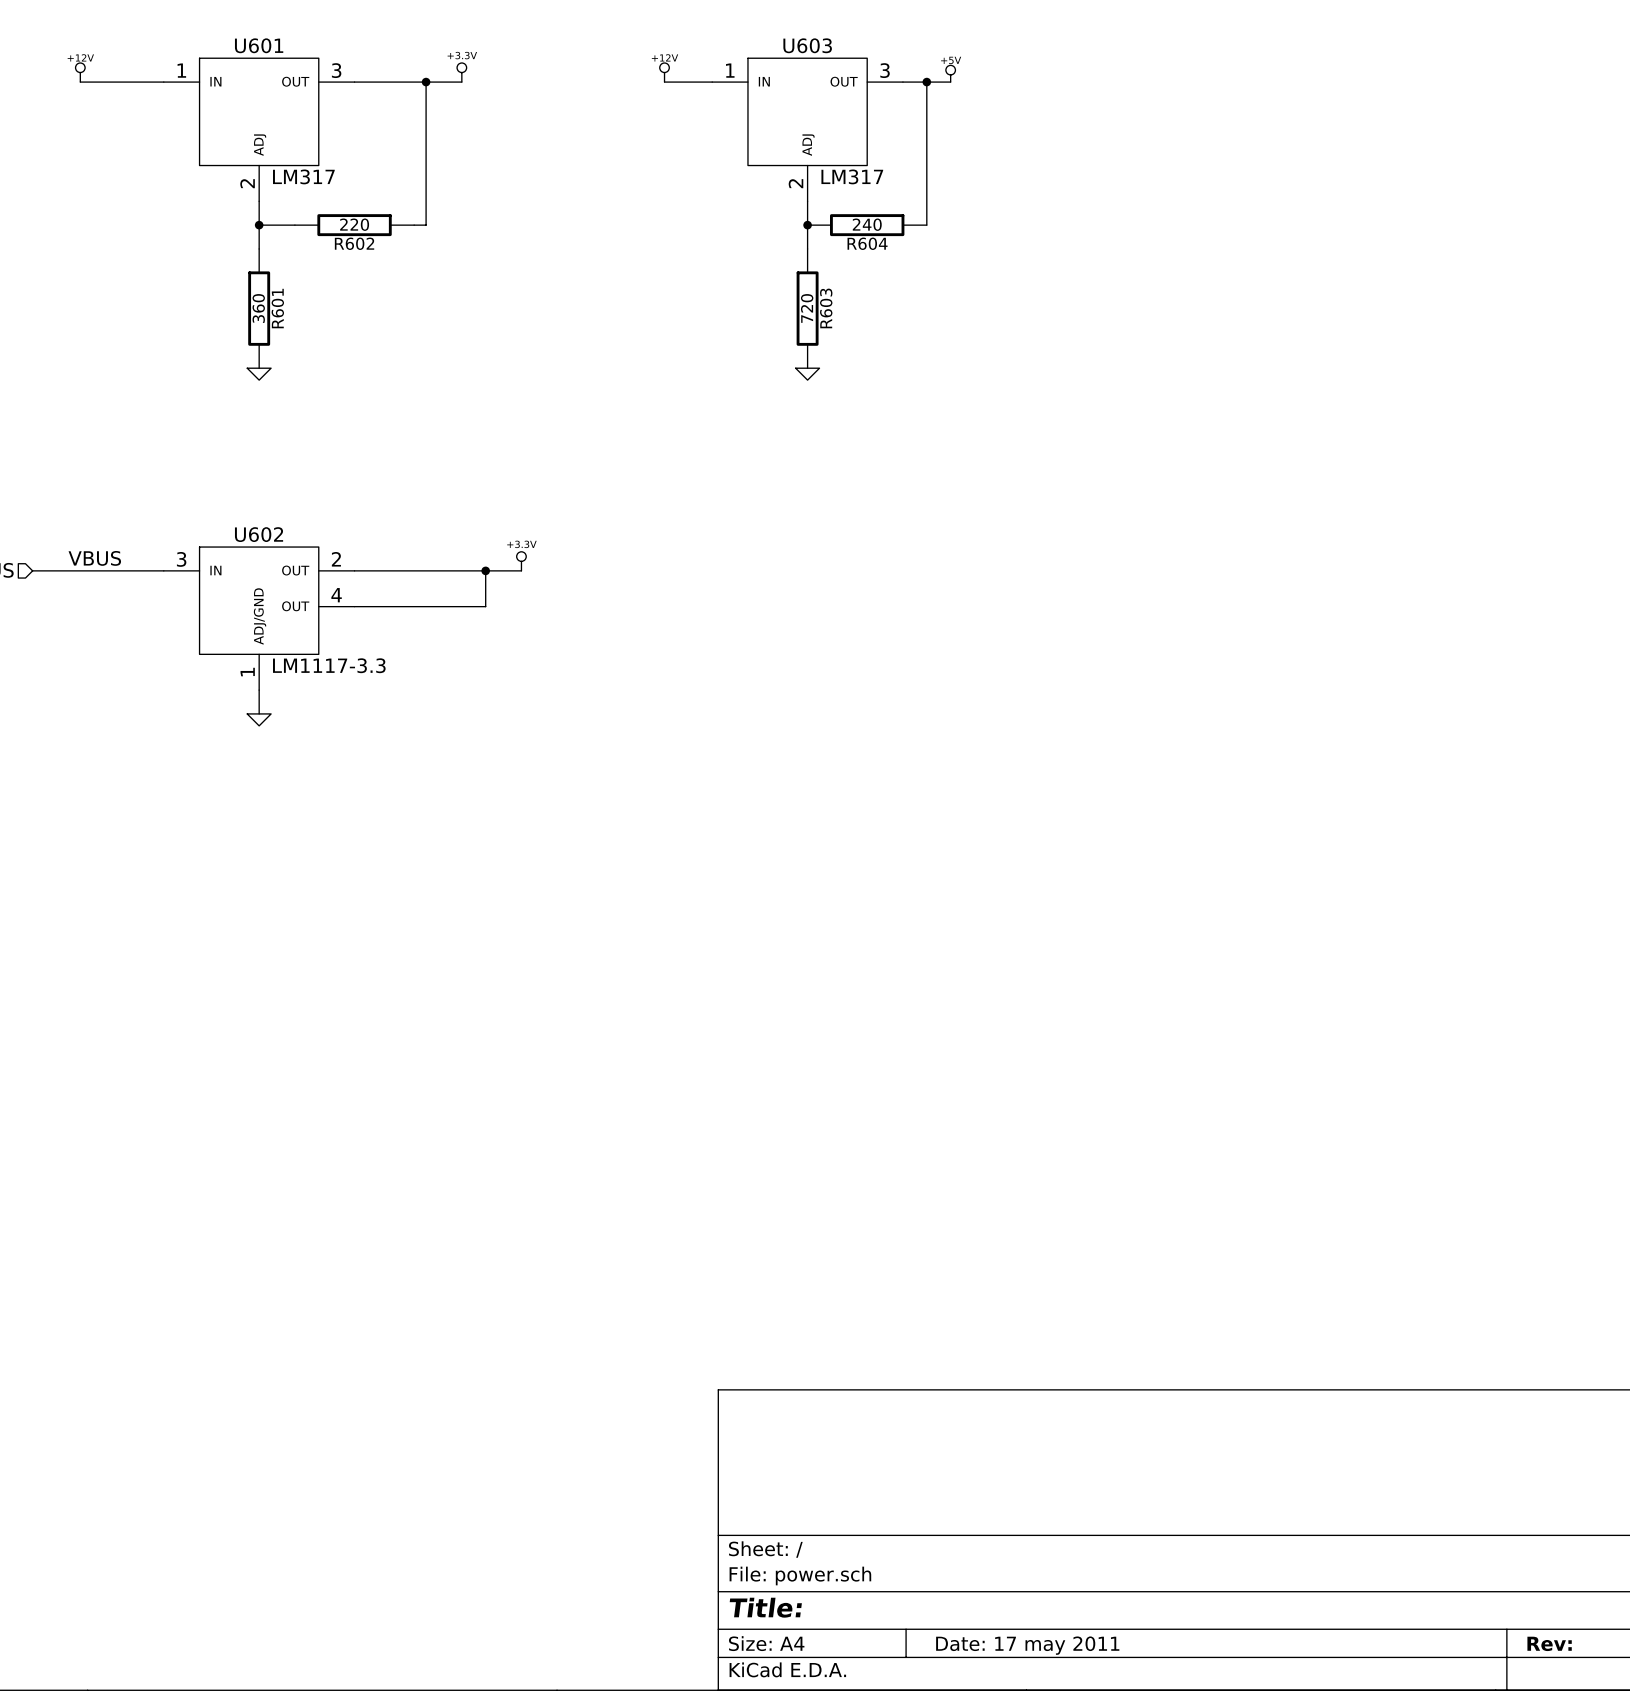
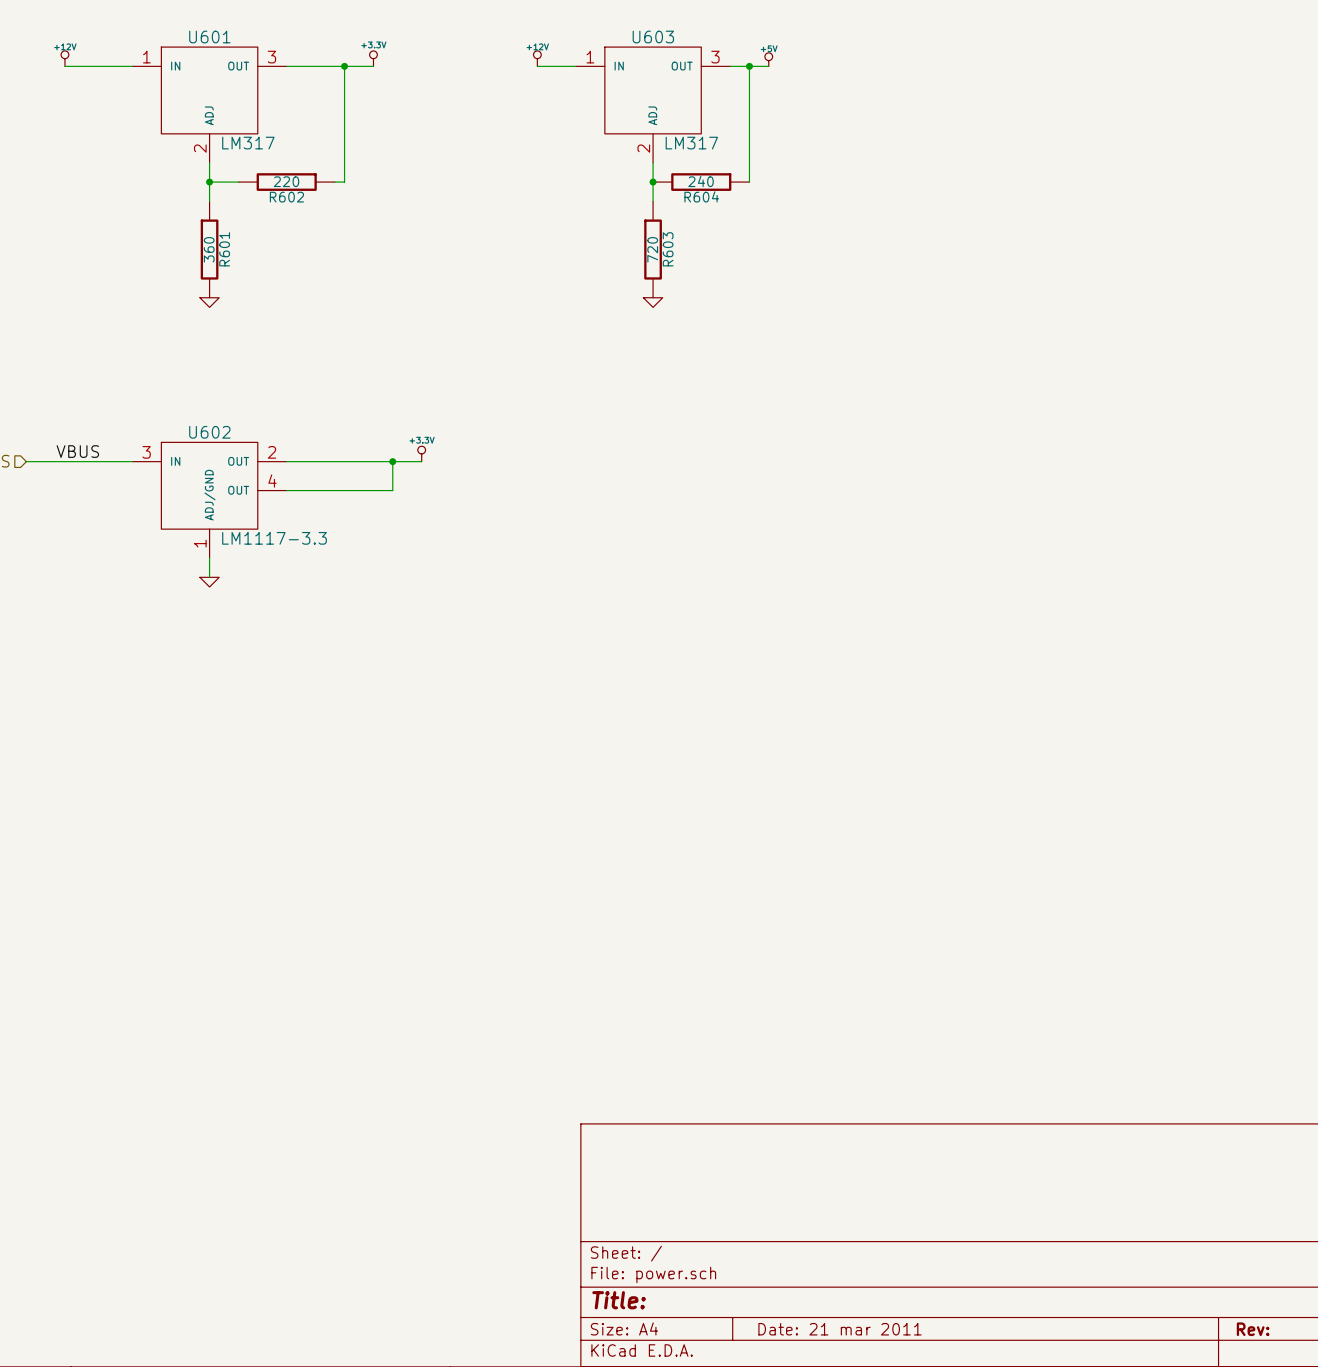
title block: Date: 17 may 2011 (1027, 1645) -> Date: 21 mar 2011 (840, 1329)

